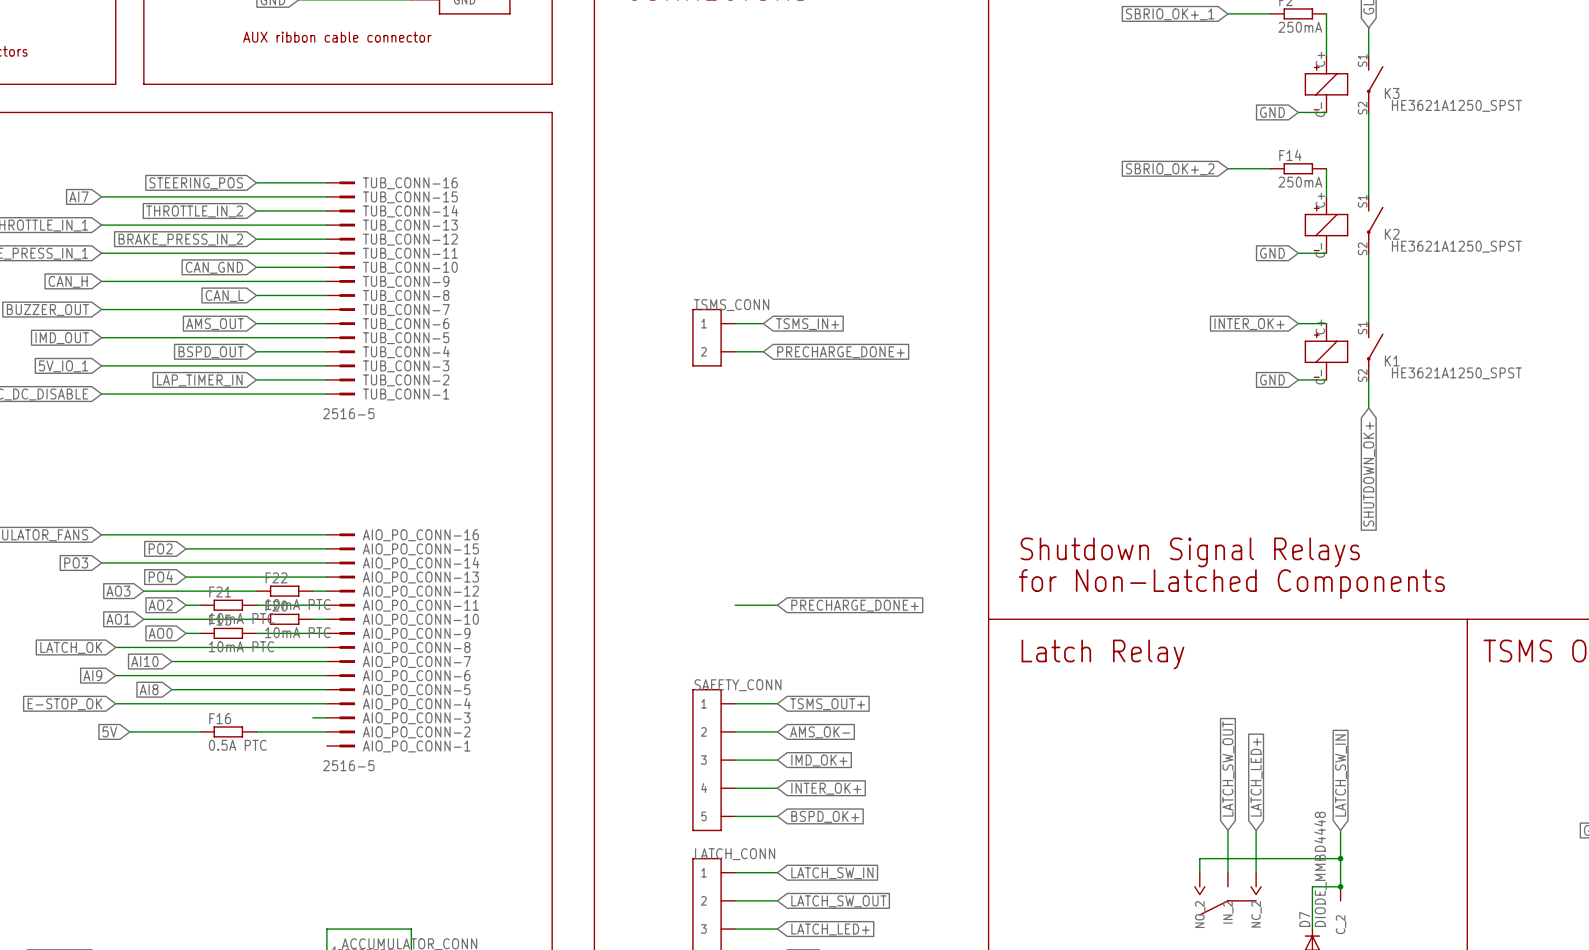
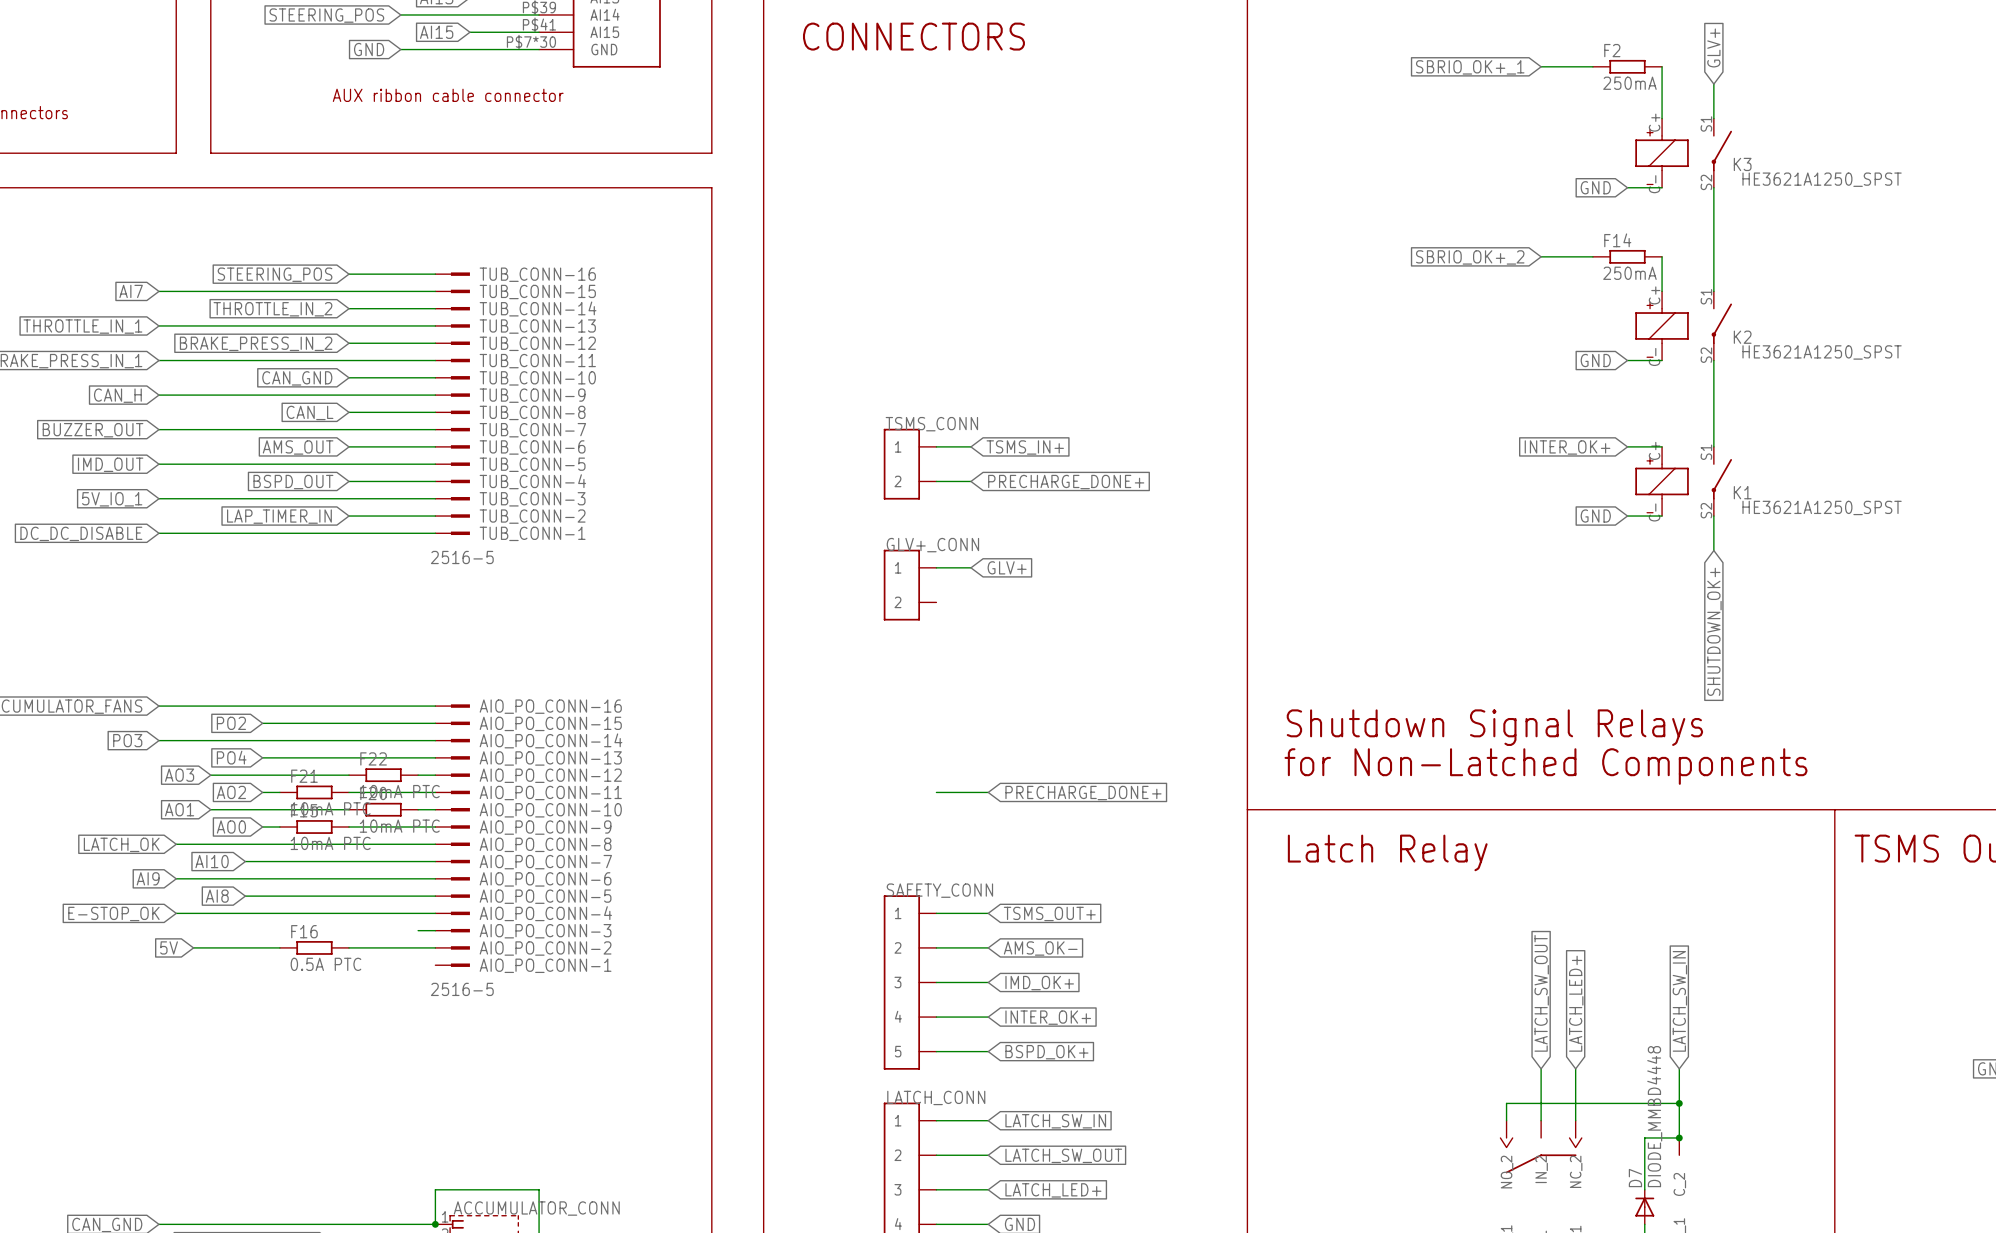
wire: none -> (936, 567) (970, 567)
global label: none -> GLV+ (1007, 567)
GLV+_CONN: none -> (910, 585)

